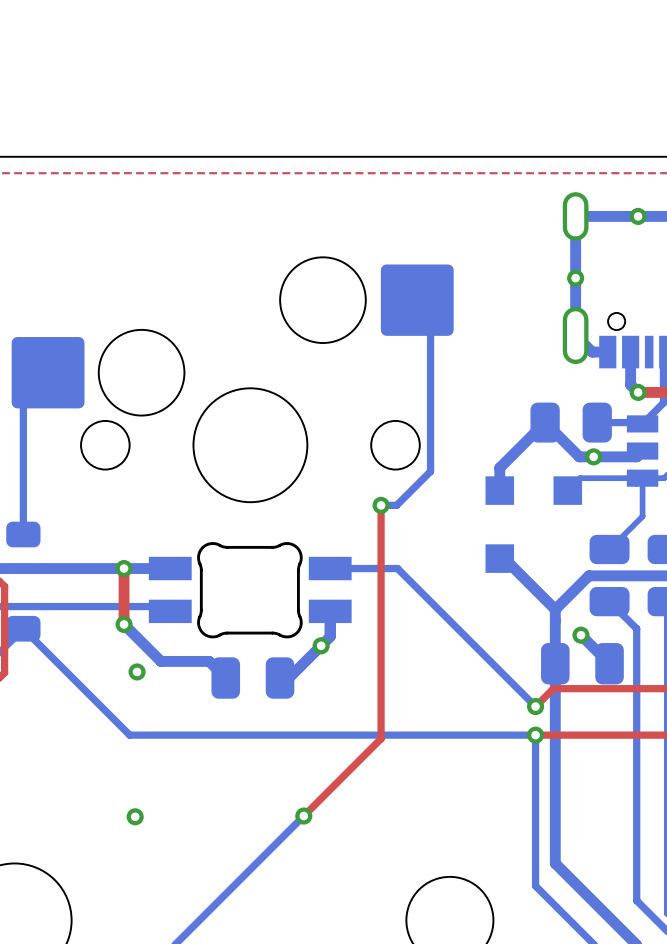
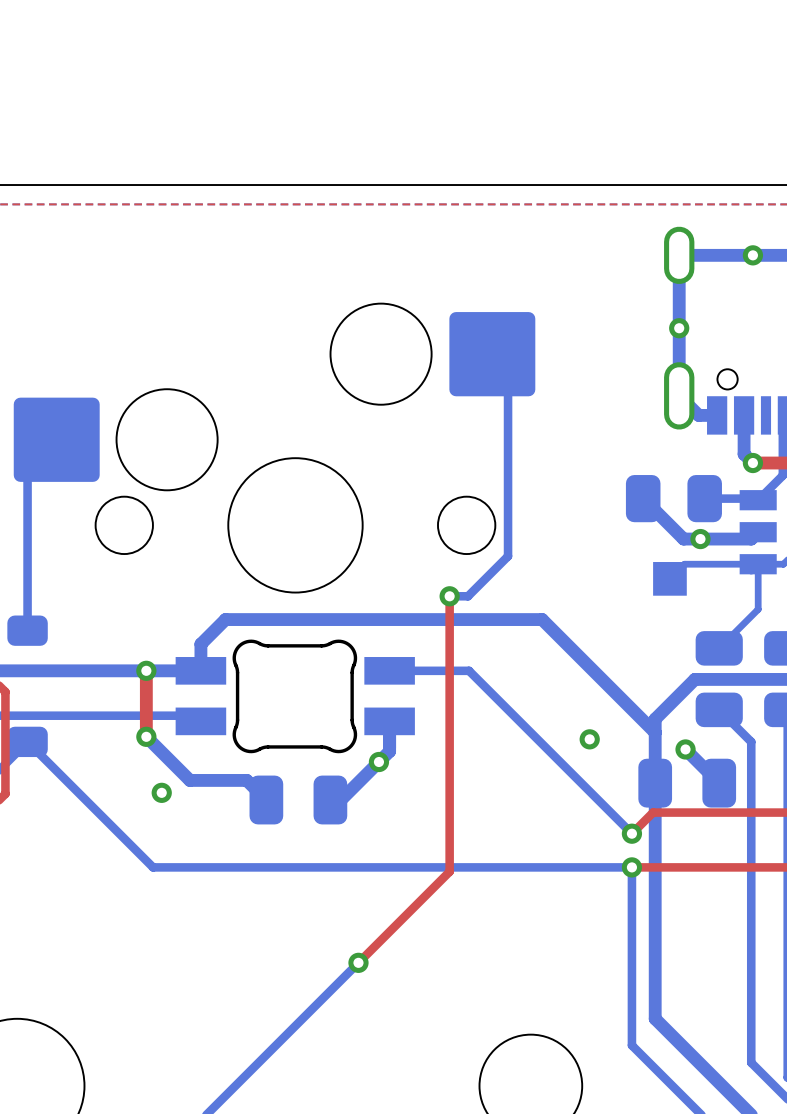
bottom track: (545, 422) (499, 467) (499, 490) -> none
part: (499, 490) -> none
bottom track: (499, 558) (504, 558) (555, 609) -> none
part: (499, 558) -> none
bottom track: none -> (200, 670) (200, 644) (225, 619) (542, 619) (655, 732)
via: none -> (589, 739)
via: (135, 816) -> none

